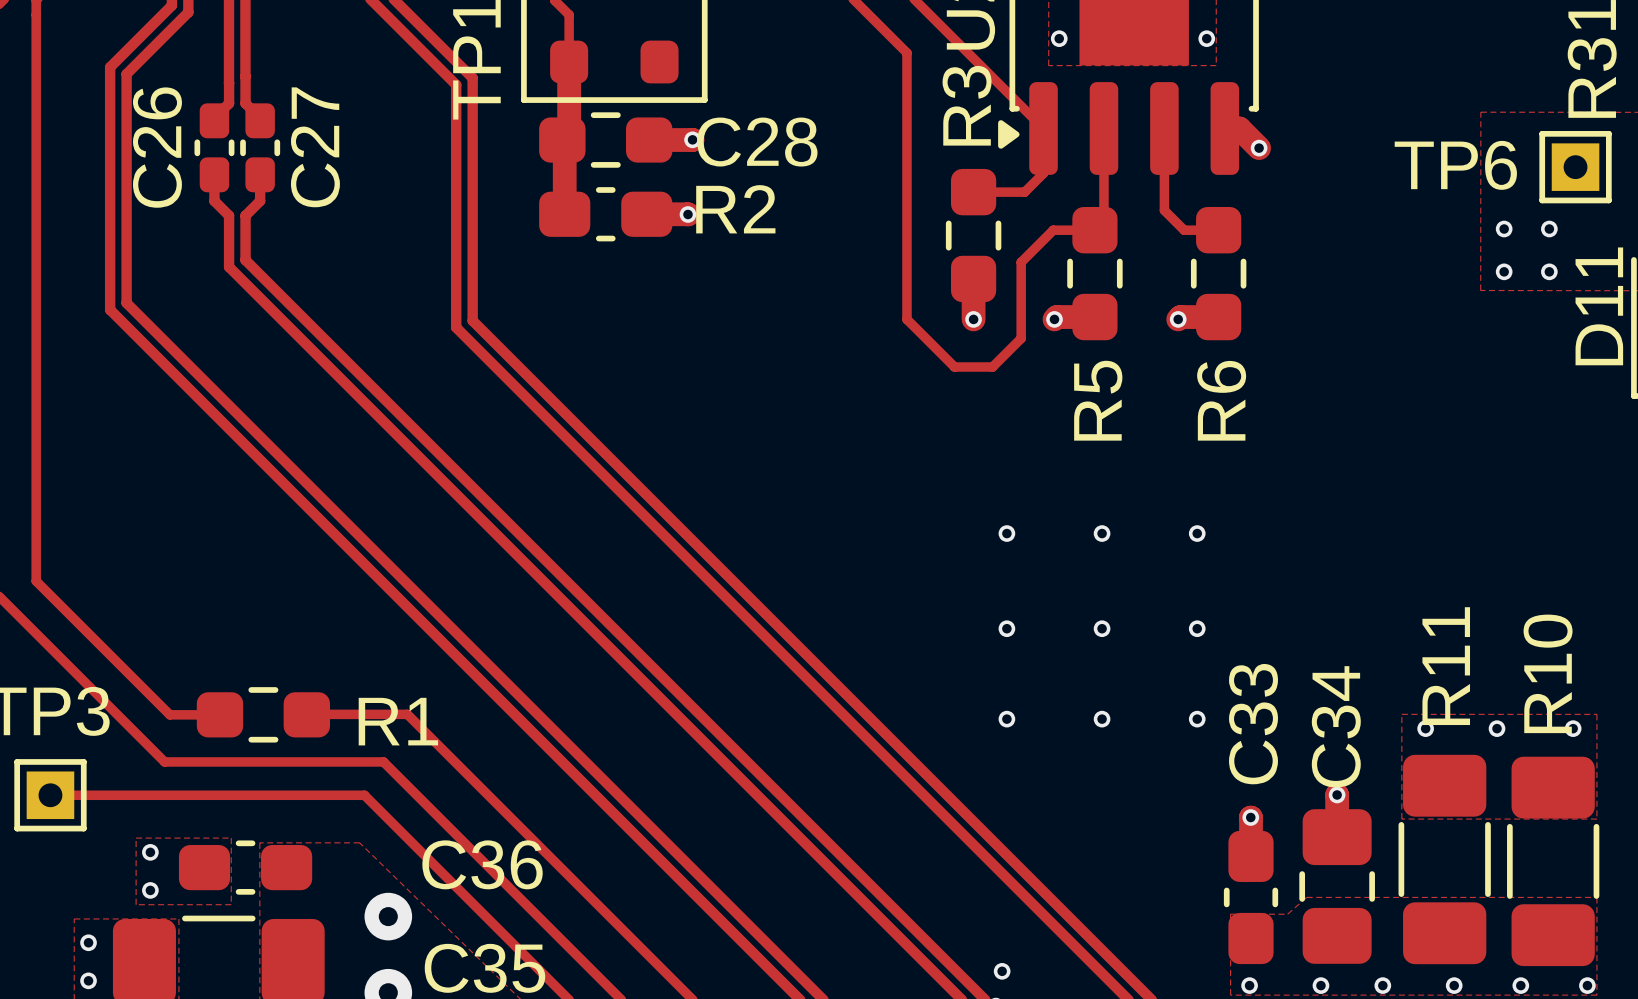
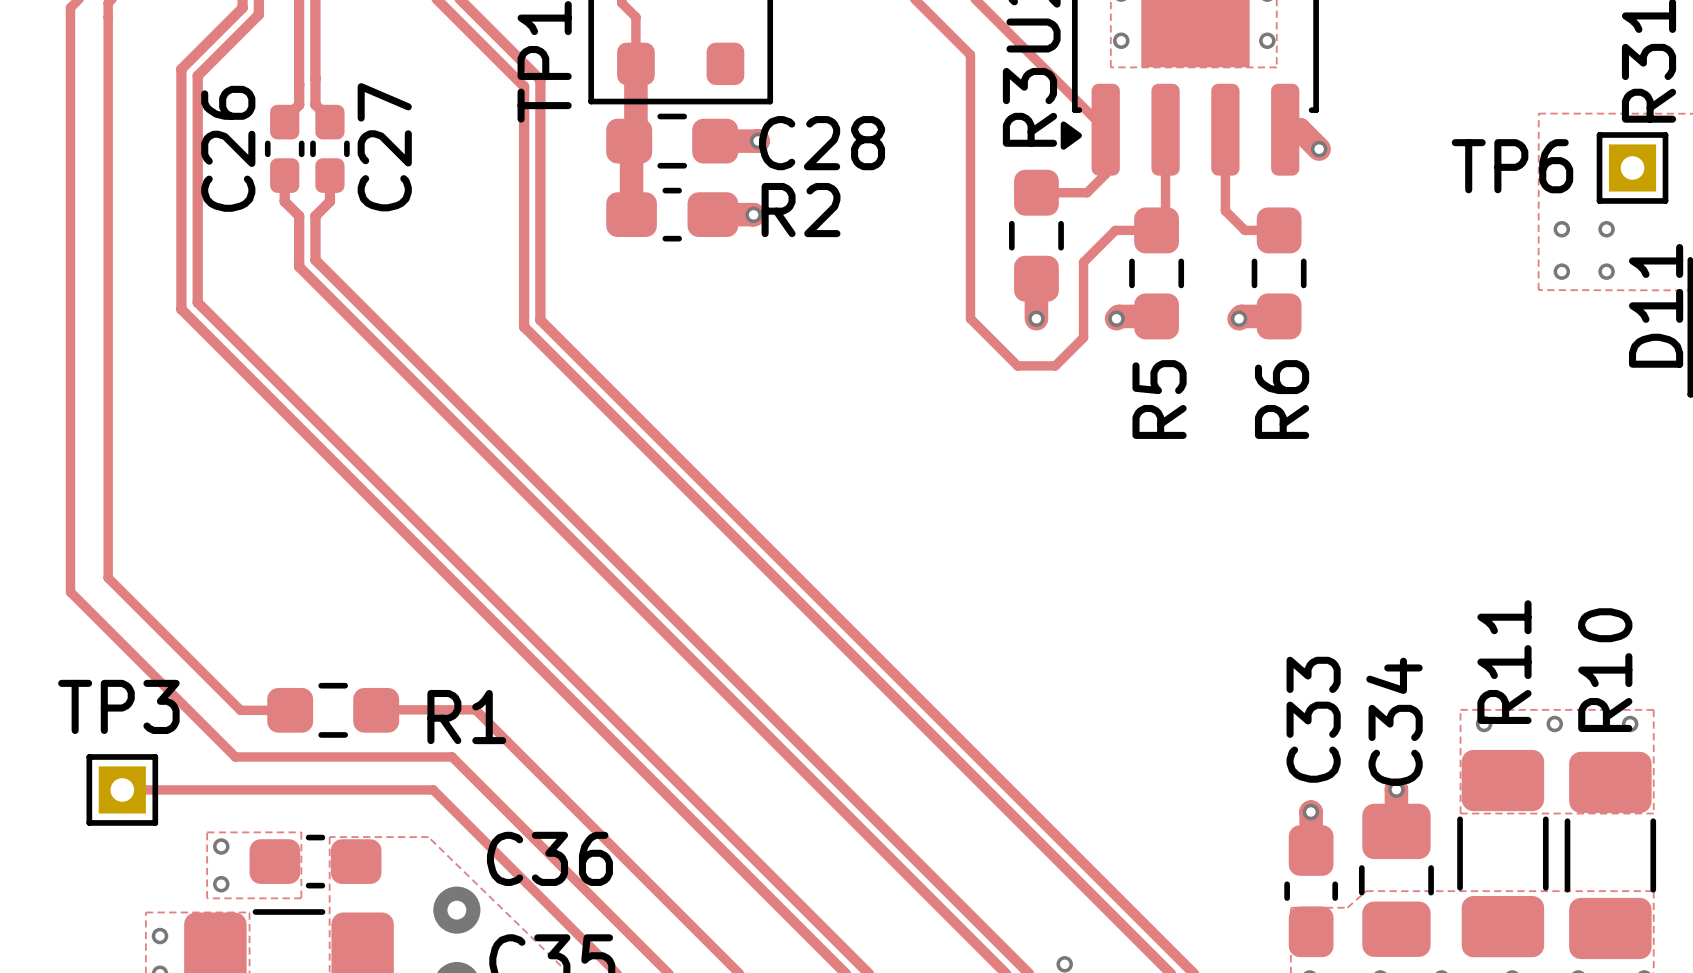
via: (1006, 533) -> none
via: (1102, 533) -> none
via: (1197, 533) -> none
via: (1006, 628) -> none
via: (1102, 628) -> none
via: (1197, 628) -> none
via: (1006, 719) -> none
via: (1102, 719) -> none
via: (1197, 719) -> none

